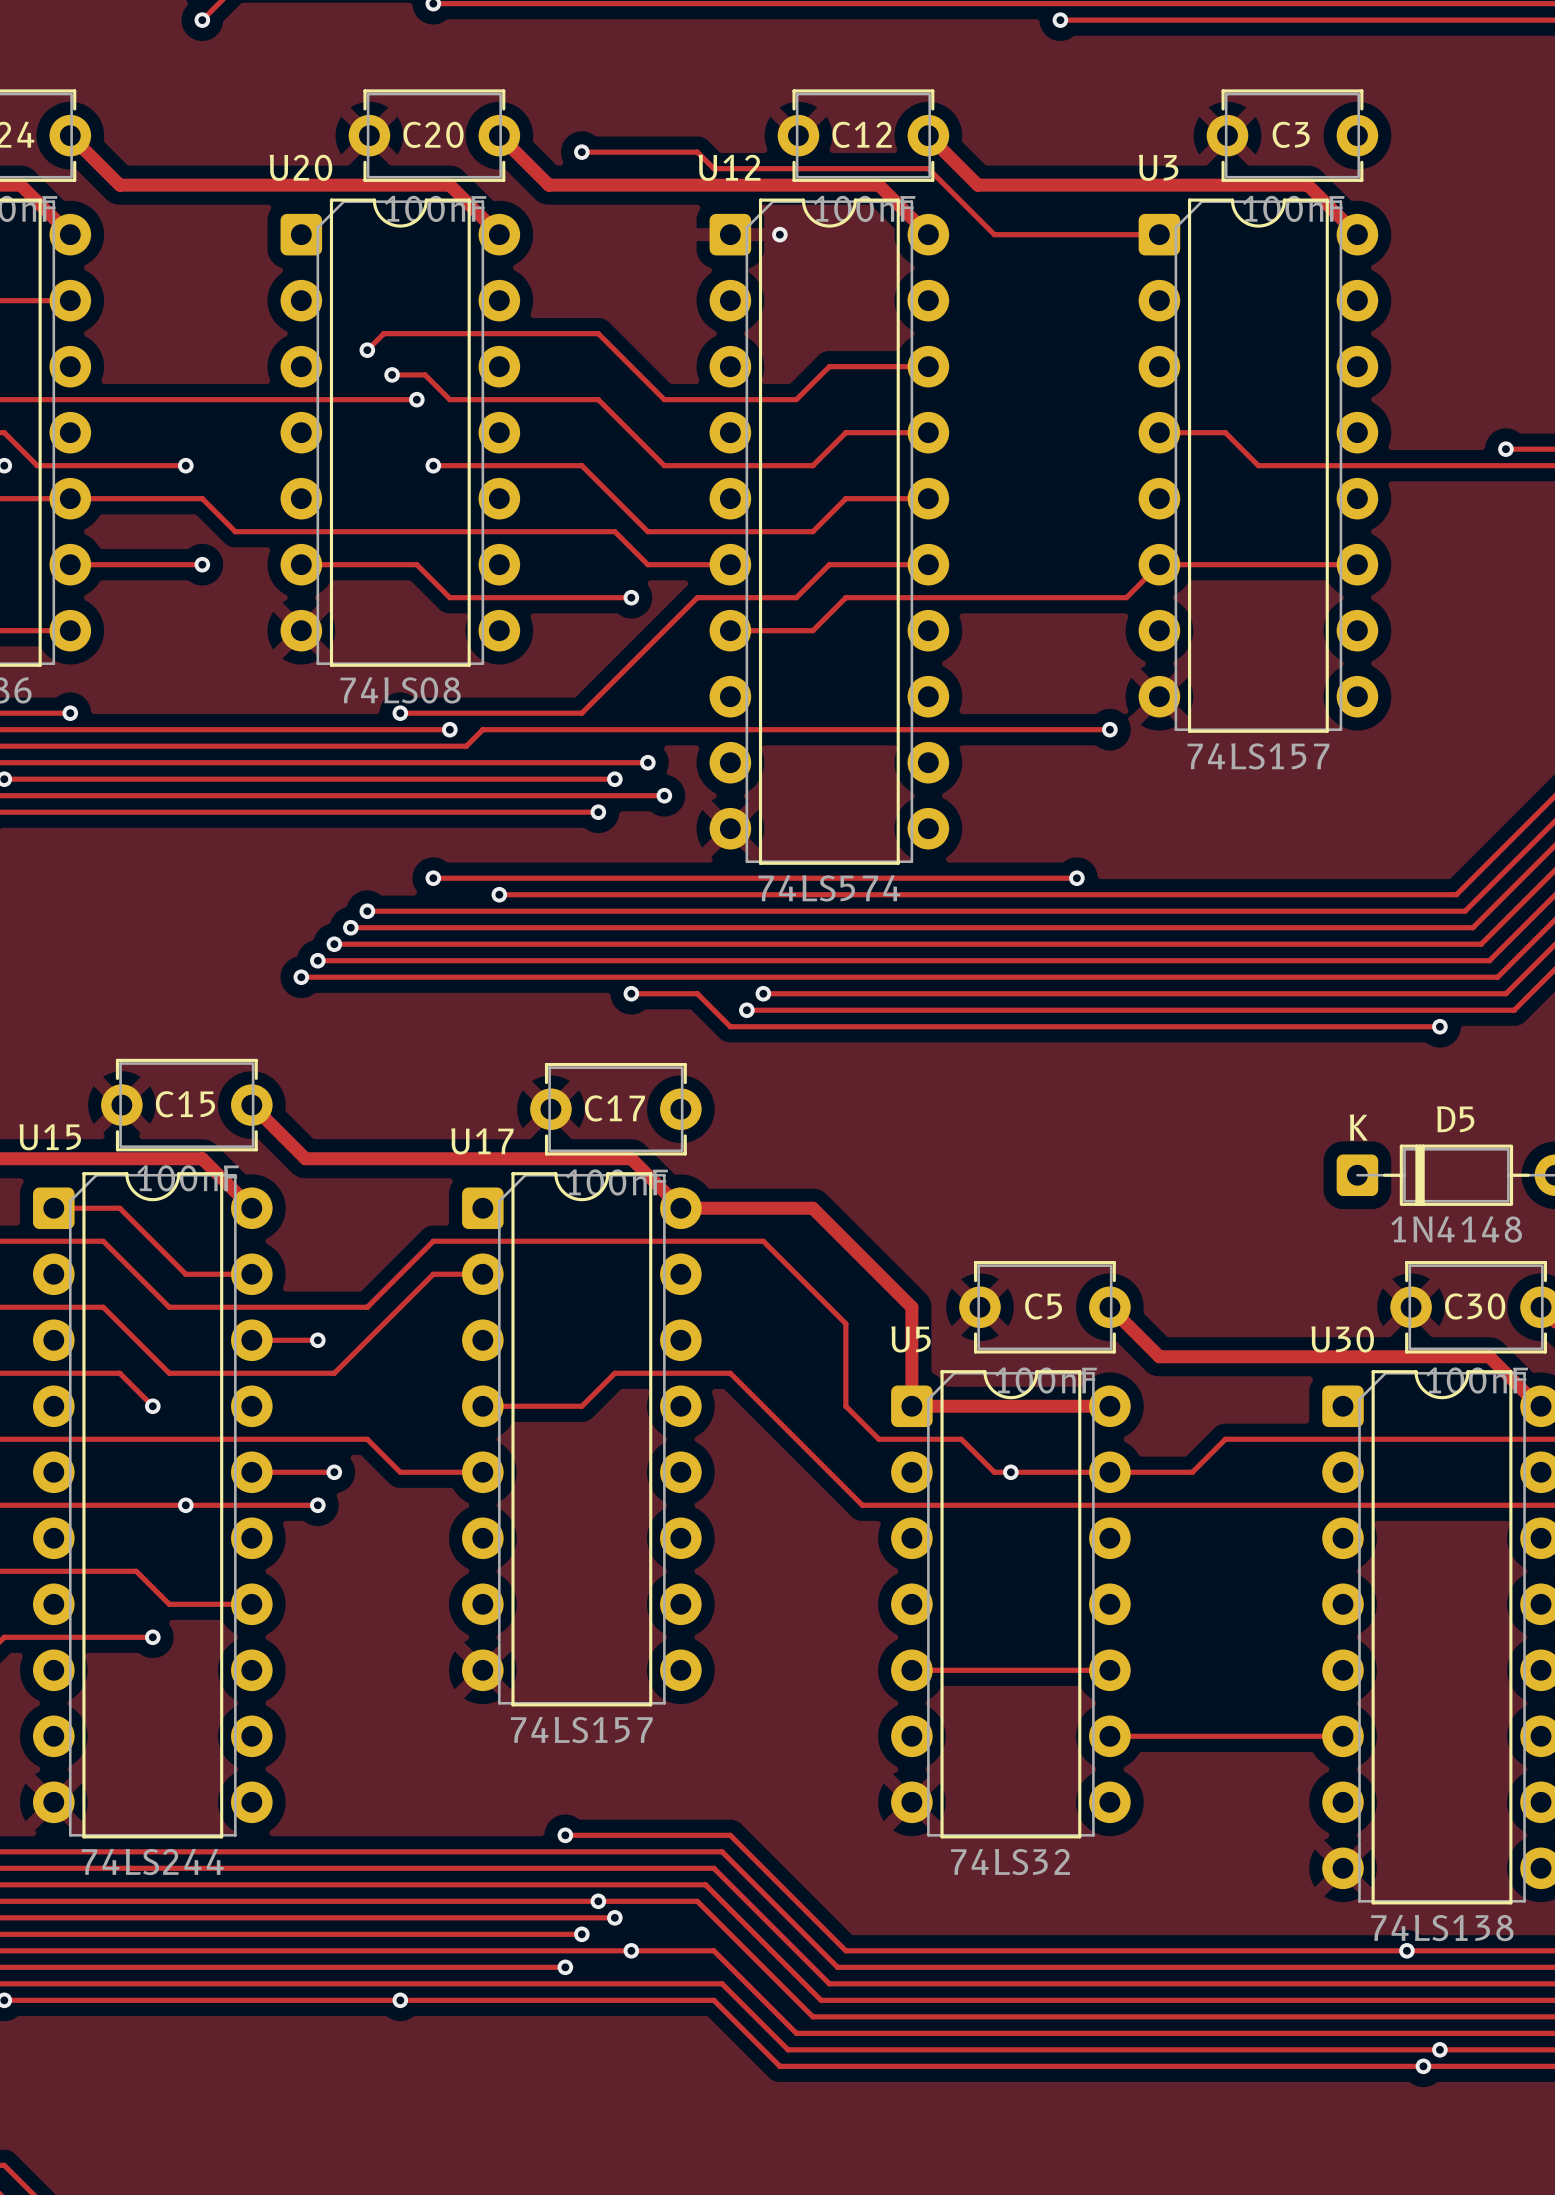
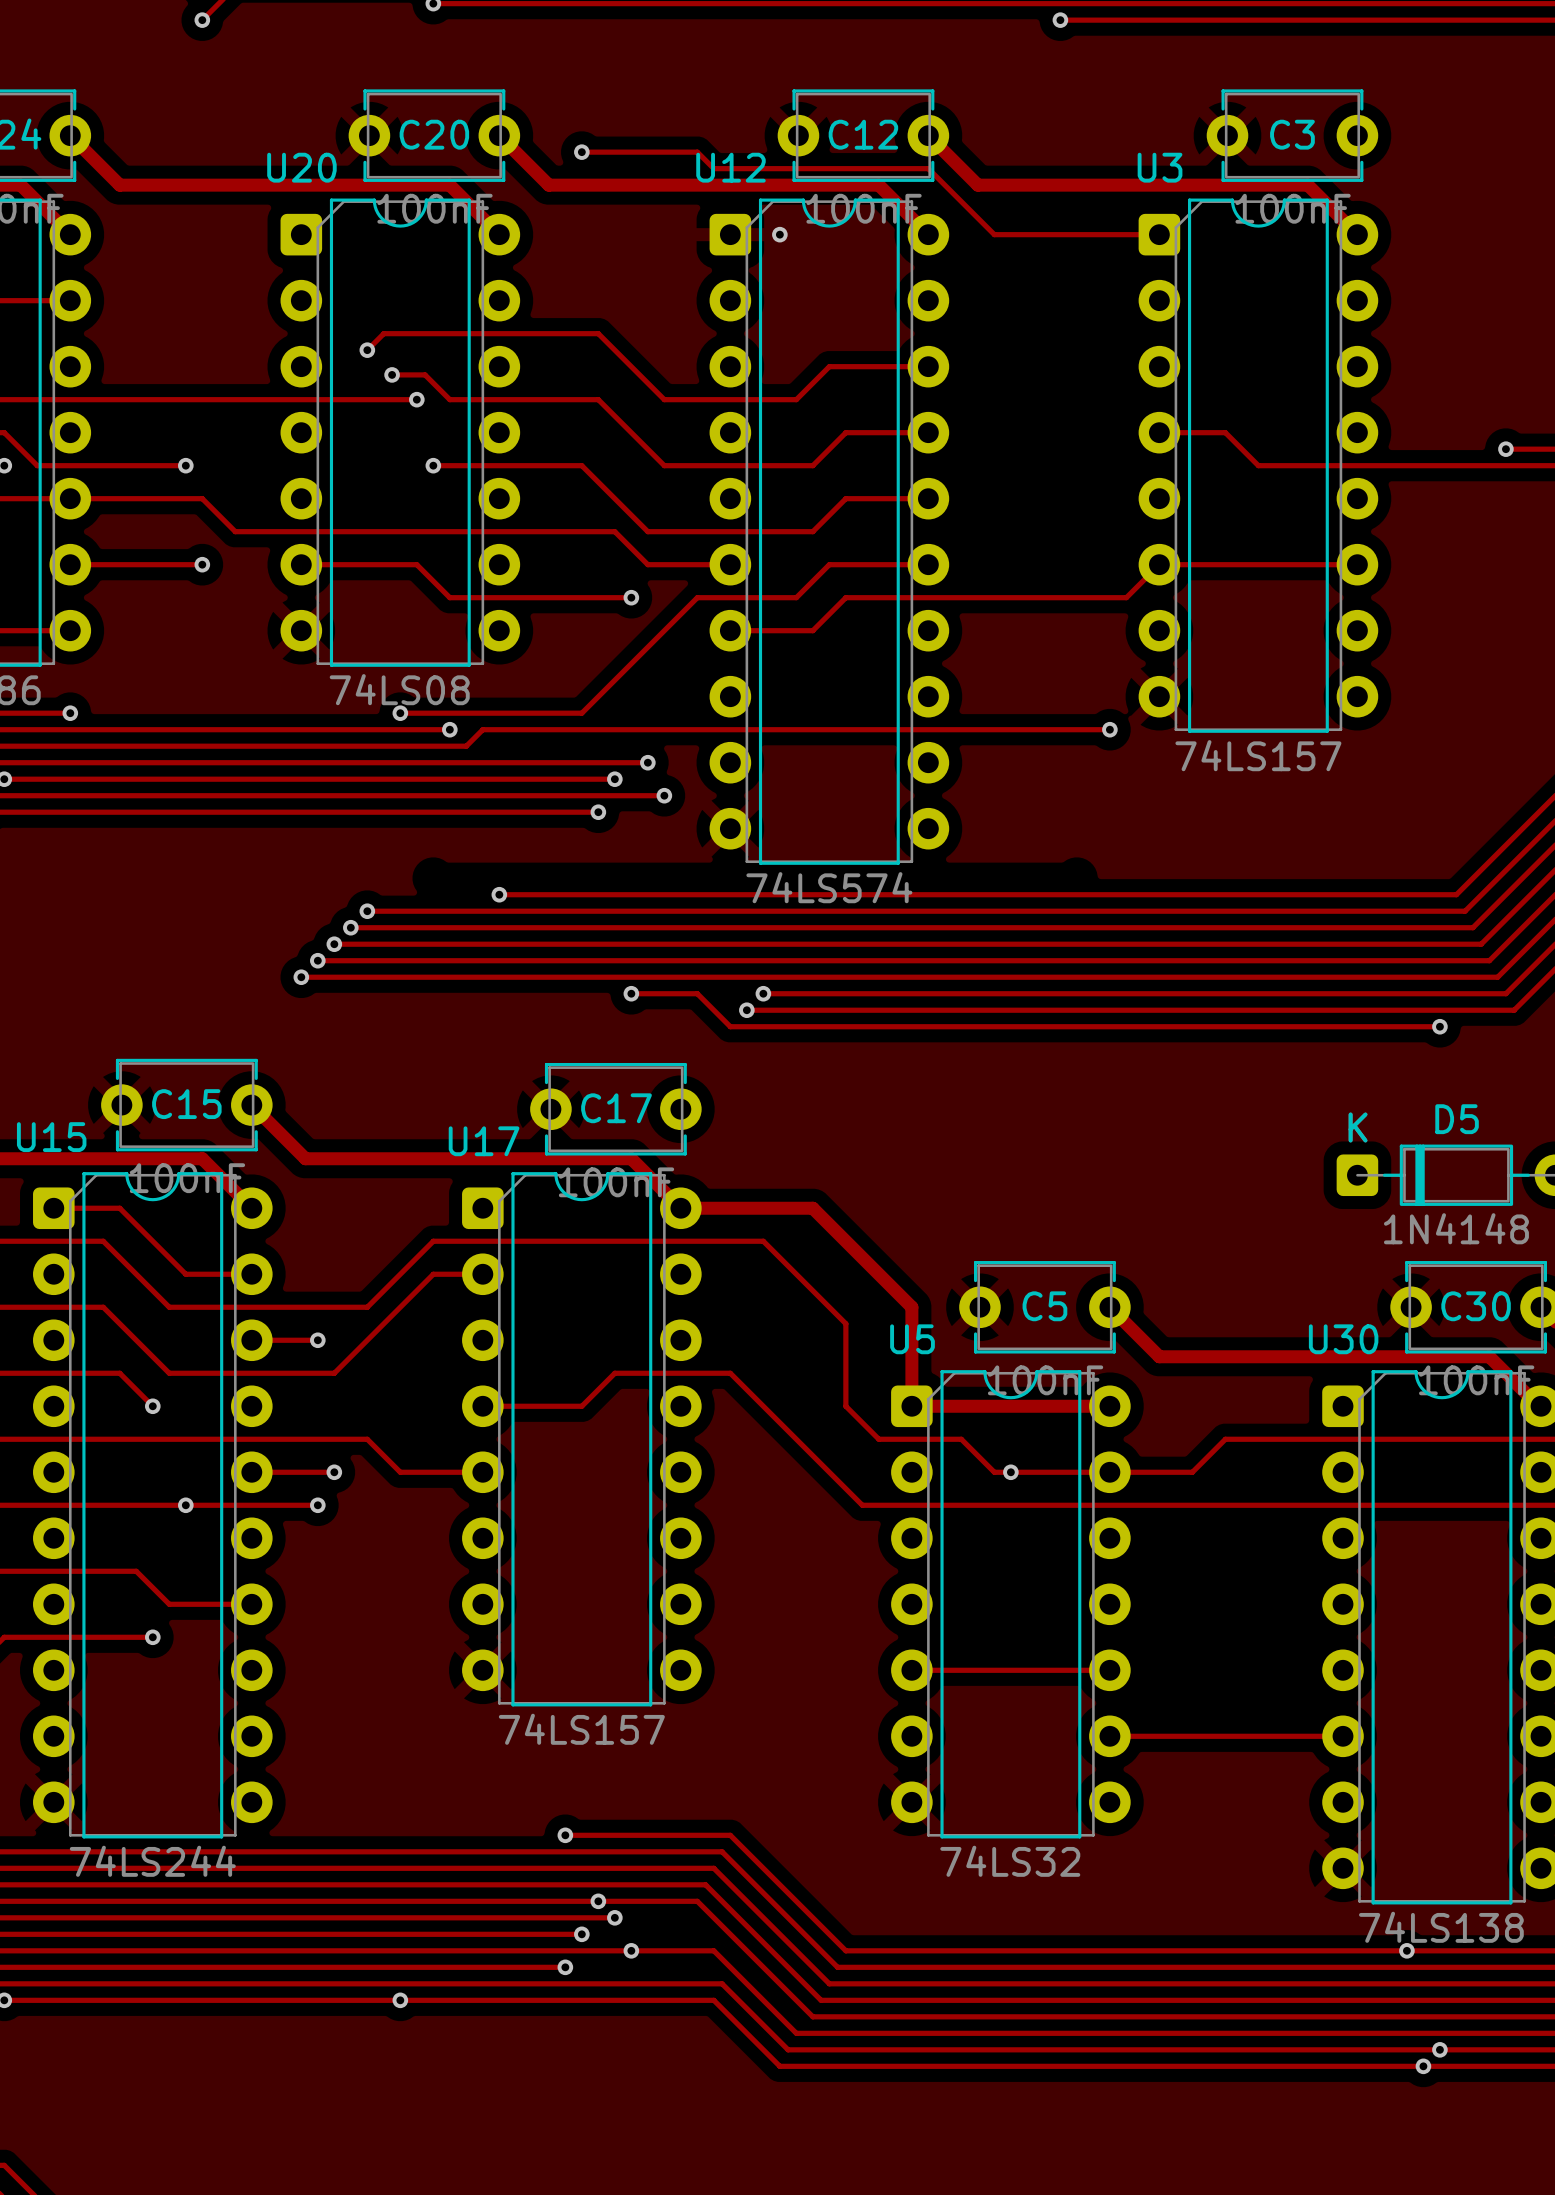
track: (433, 878) (1076, 878) -> none
via: (433, 878) -> none
via: (1076, 878) -> none

